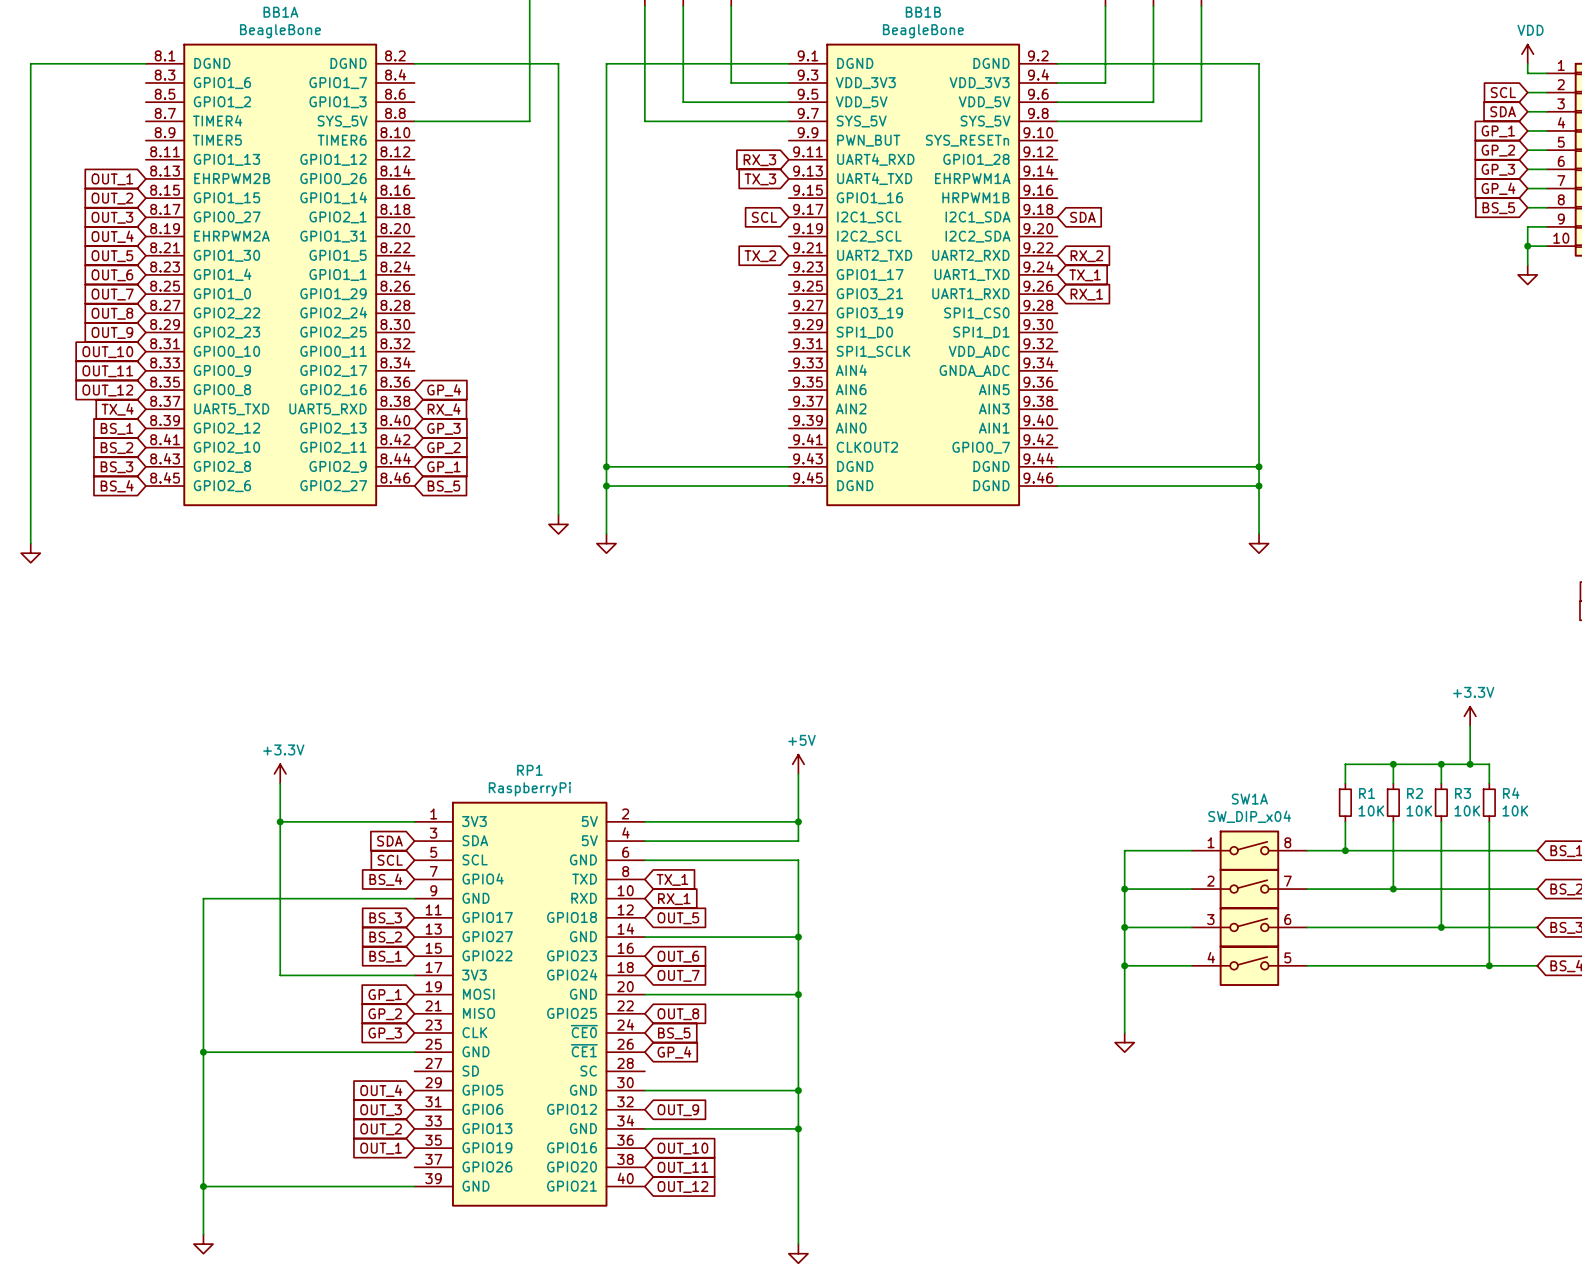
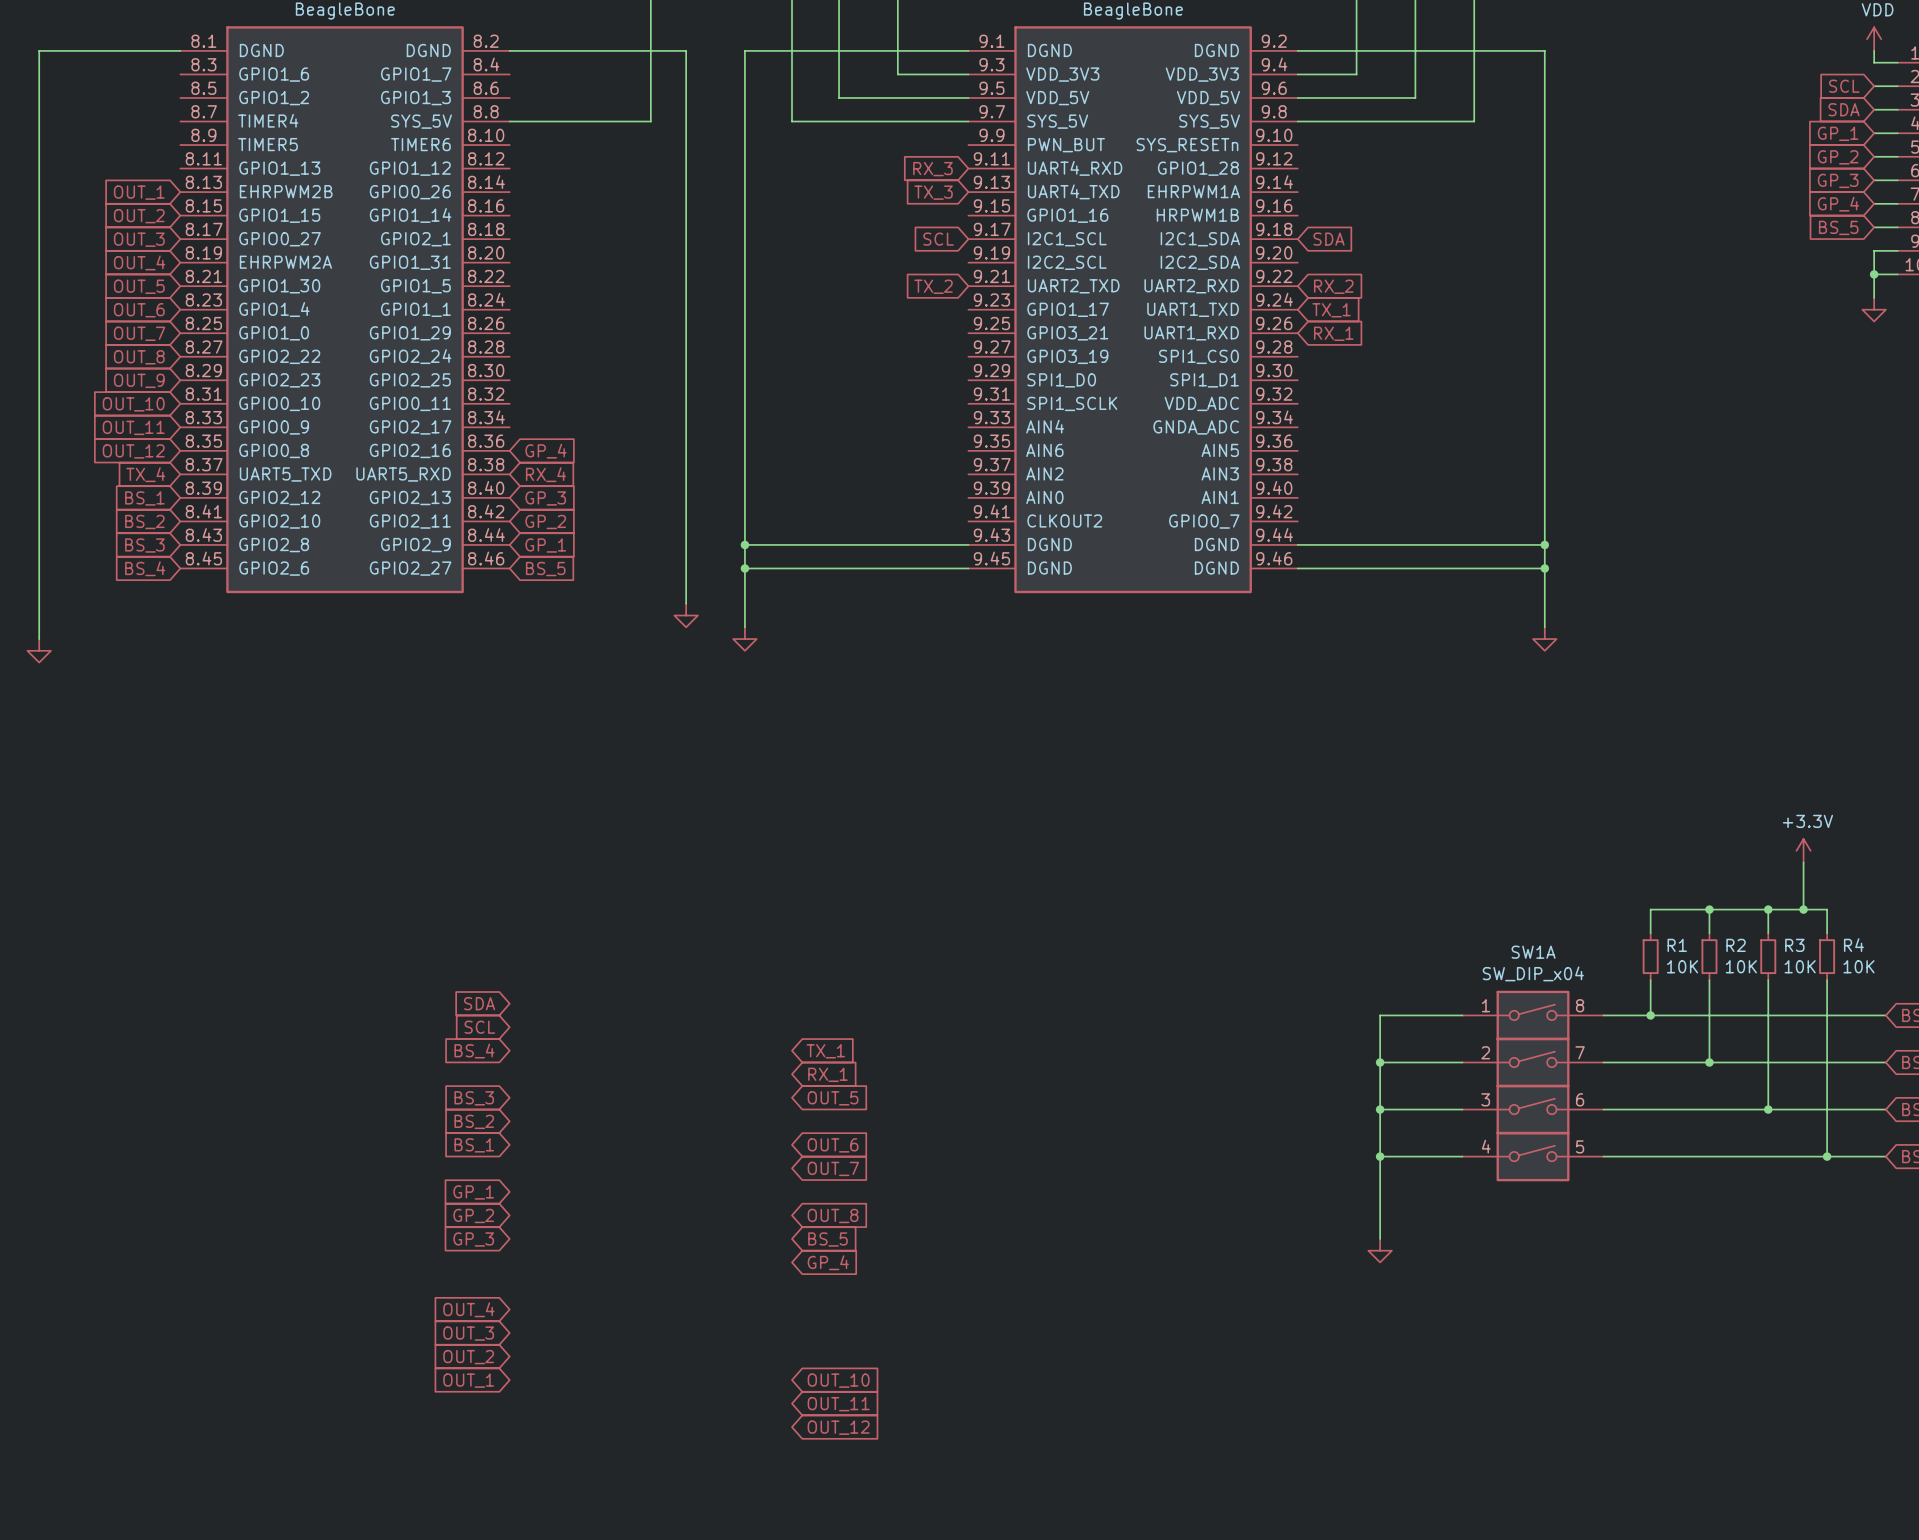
power symbol: +5V (798, 764) -> none
power symbol: +3.3V (280, 773) -> none
wire: (798, 773) (798, 841) (644, 841) -> none
wire: (280, 783) (280, 975) (414, 975) -> none
wire: (280, 821) (414, 821) -> none
junction: (280, 821) -> none
wire: (644, 821) (798, 821) -> none
junction: (798, 821) -> none
wire: (644, 860) (798, 860) (798, 1244) -> none
wire: (414, 898) (203, 898) (203, 1234) -> none
wire: (644, 937) (798, 937) -> none
junction: (798, 937) -> none
wire: (644, 994) (798, 994) -> none
junction: (798, 994) -> none
RP1: RaspberryPi (529, 1004) -> none
wire: (203, 1052) (414, 1052) -> none
junction: (203, 1052) -> none
wire: (644, 1090) (798, 1090) -> none
junction: (798, 1090) -> none
global label: OUT_9 (678, 1110) -> none
wire: (644, 1128) (798, 1128) -> none
junction: (798, 1128) -> none
wire: (203, 1186) (414, 1186) -> none
junction: (203, 1186) -> none
power symbol: (203, 1244) -> none
power symbol: (798, 1253) -> none

